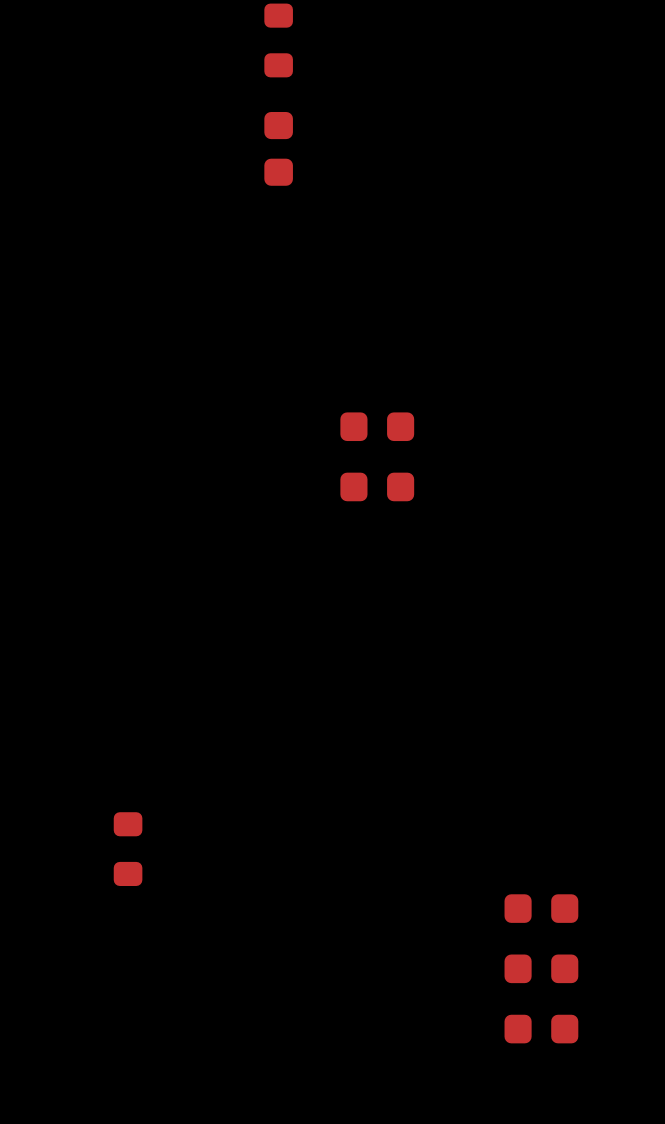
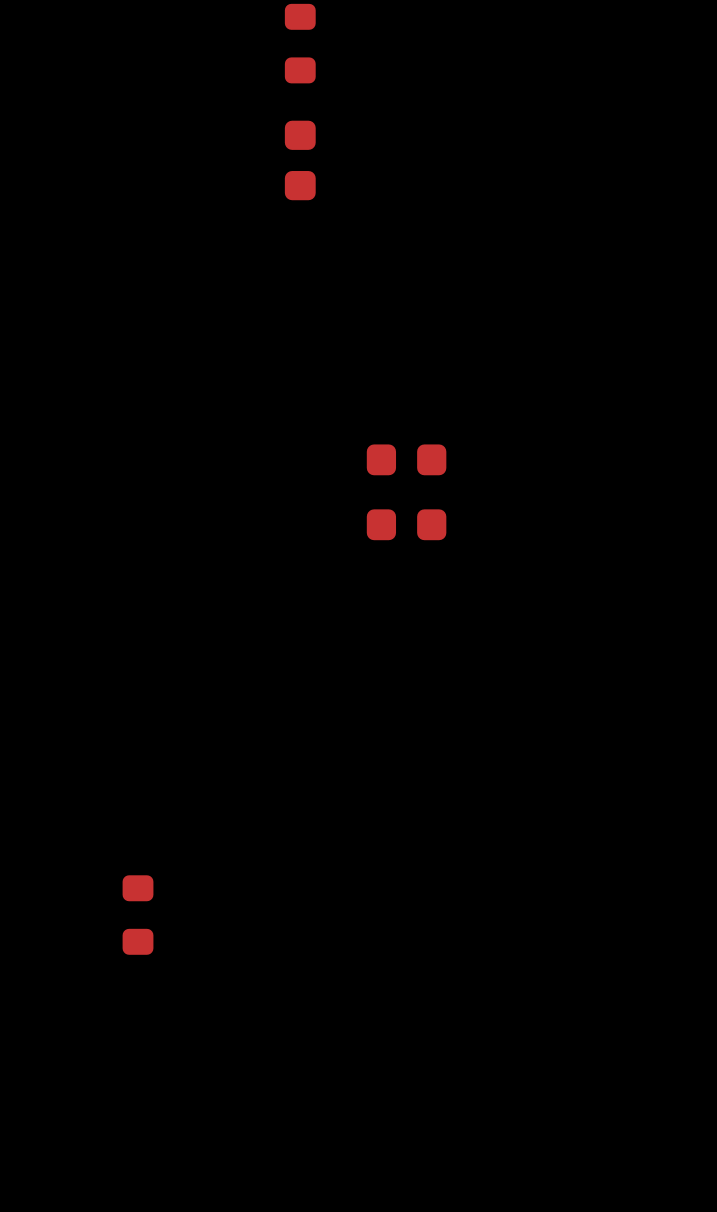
part: (541, 908) -> none
part: (541, 968) -> none
part: (541, 1029) -> none

